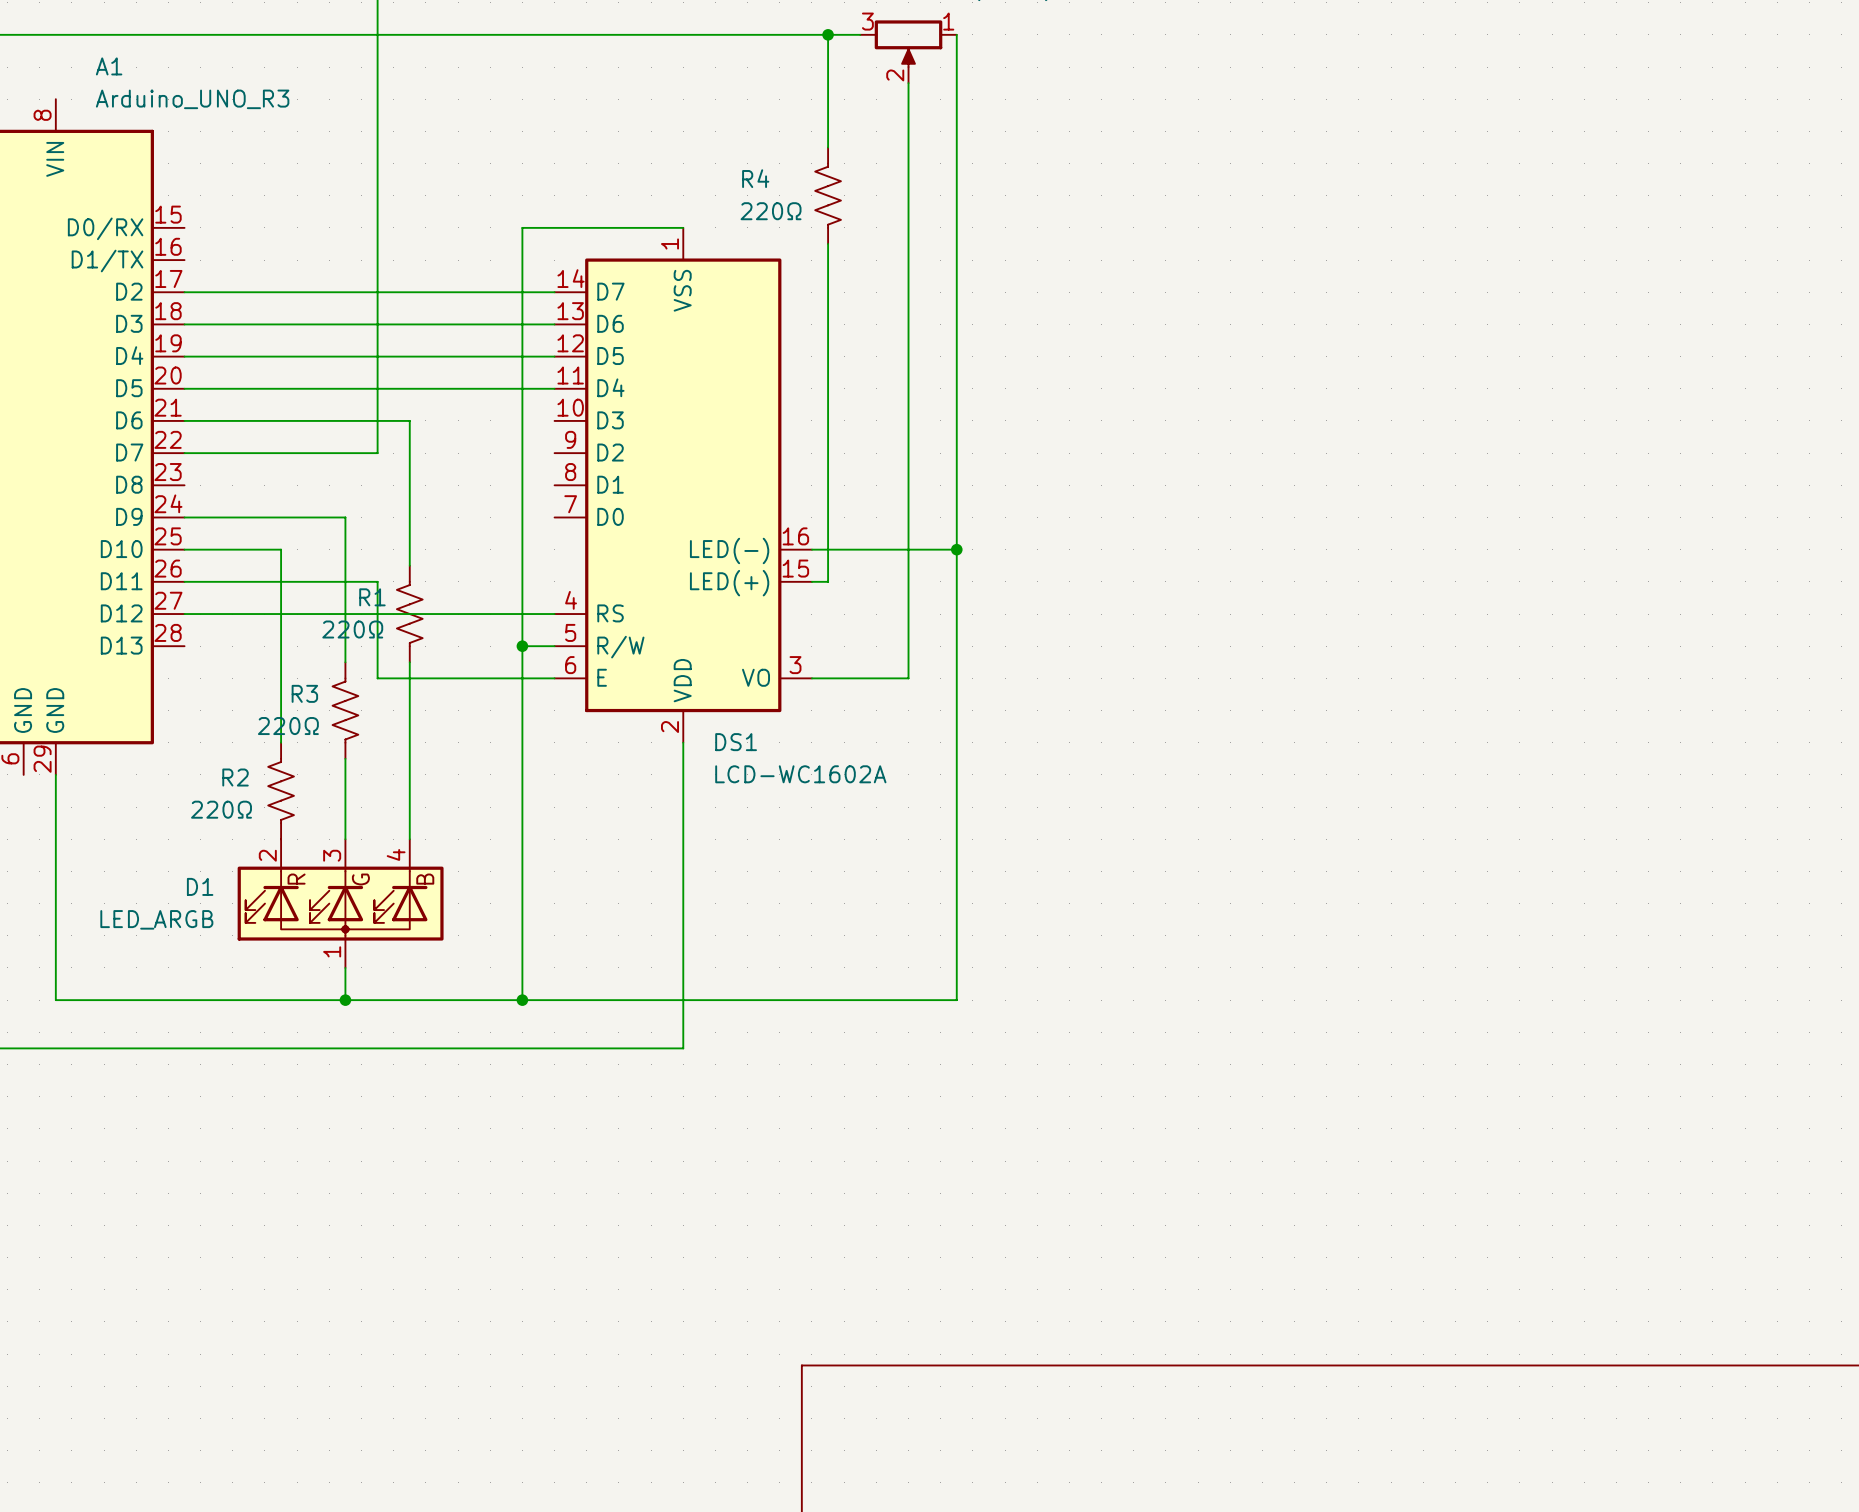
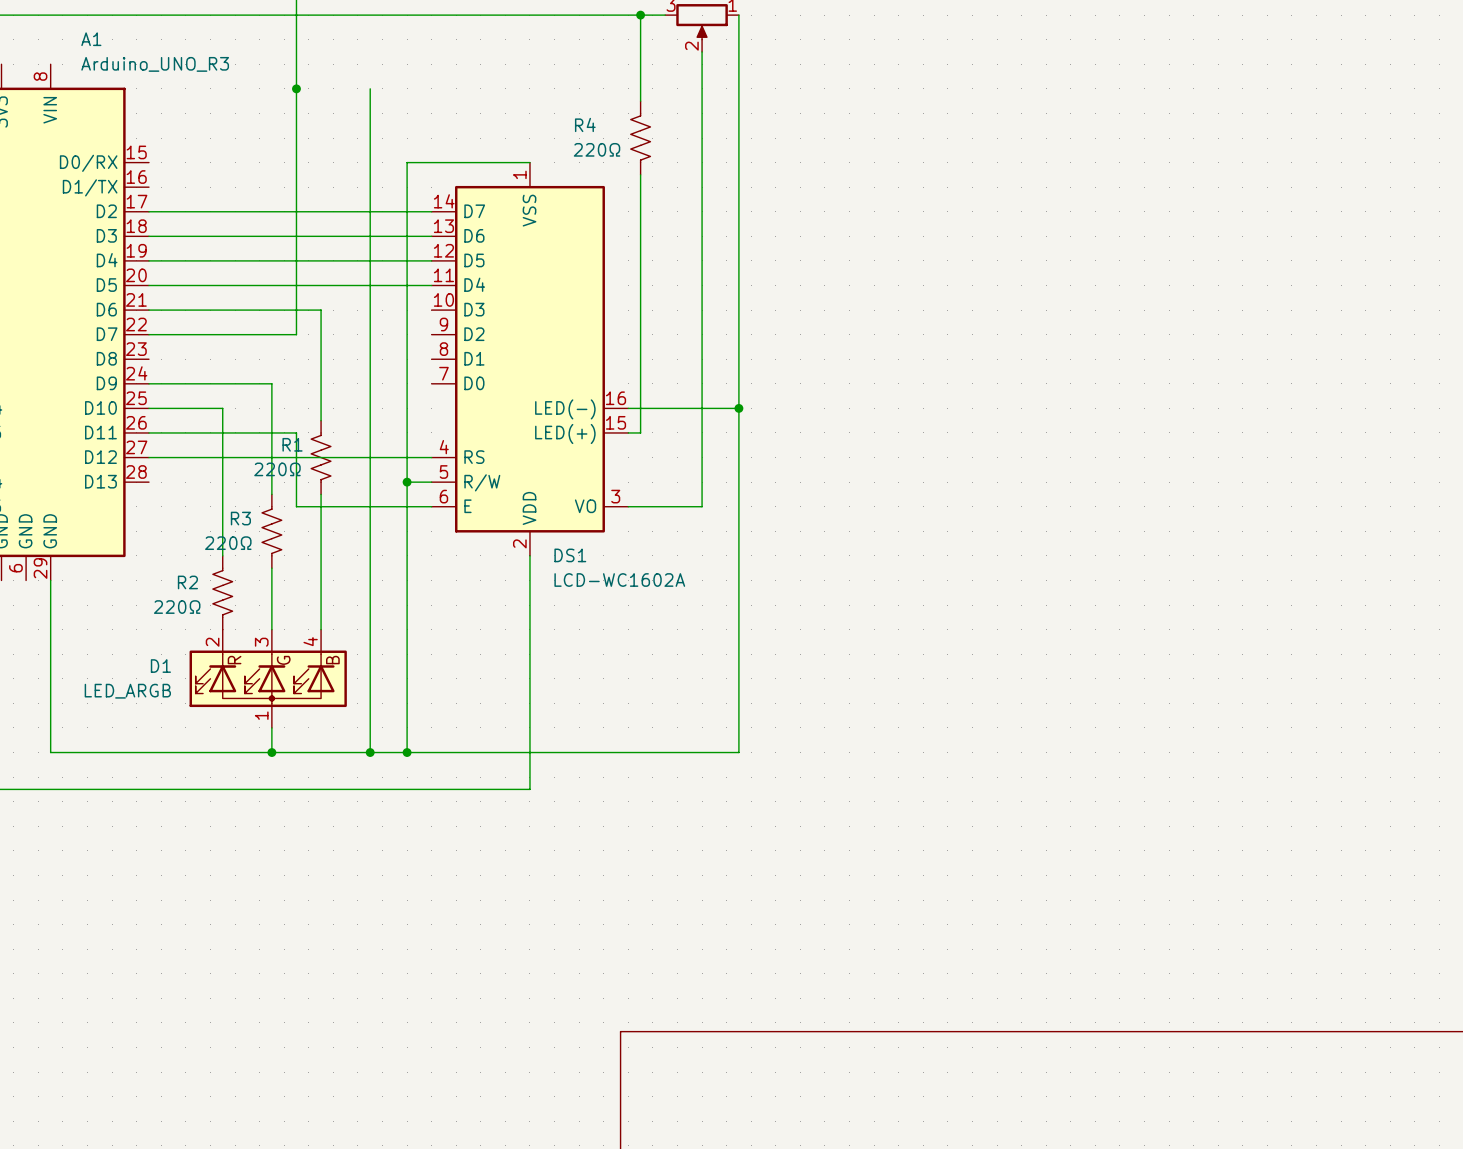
junction: none -> (296, 88)
wire: none -> (370, 88) (370, 752)
junction: none -> (370, 752)

